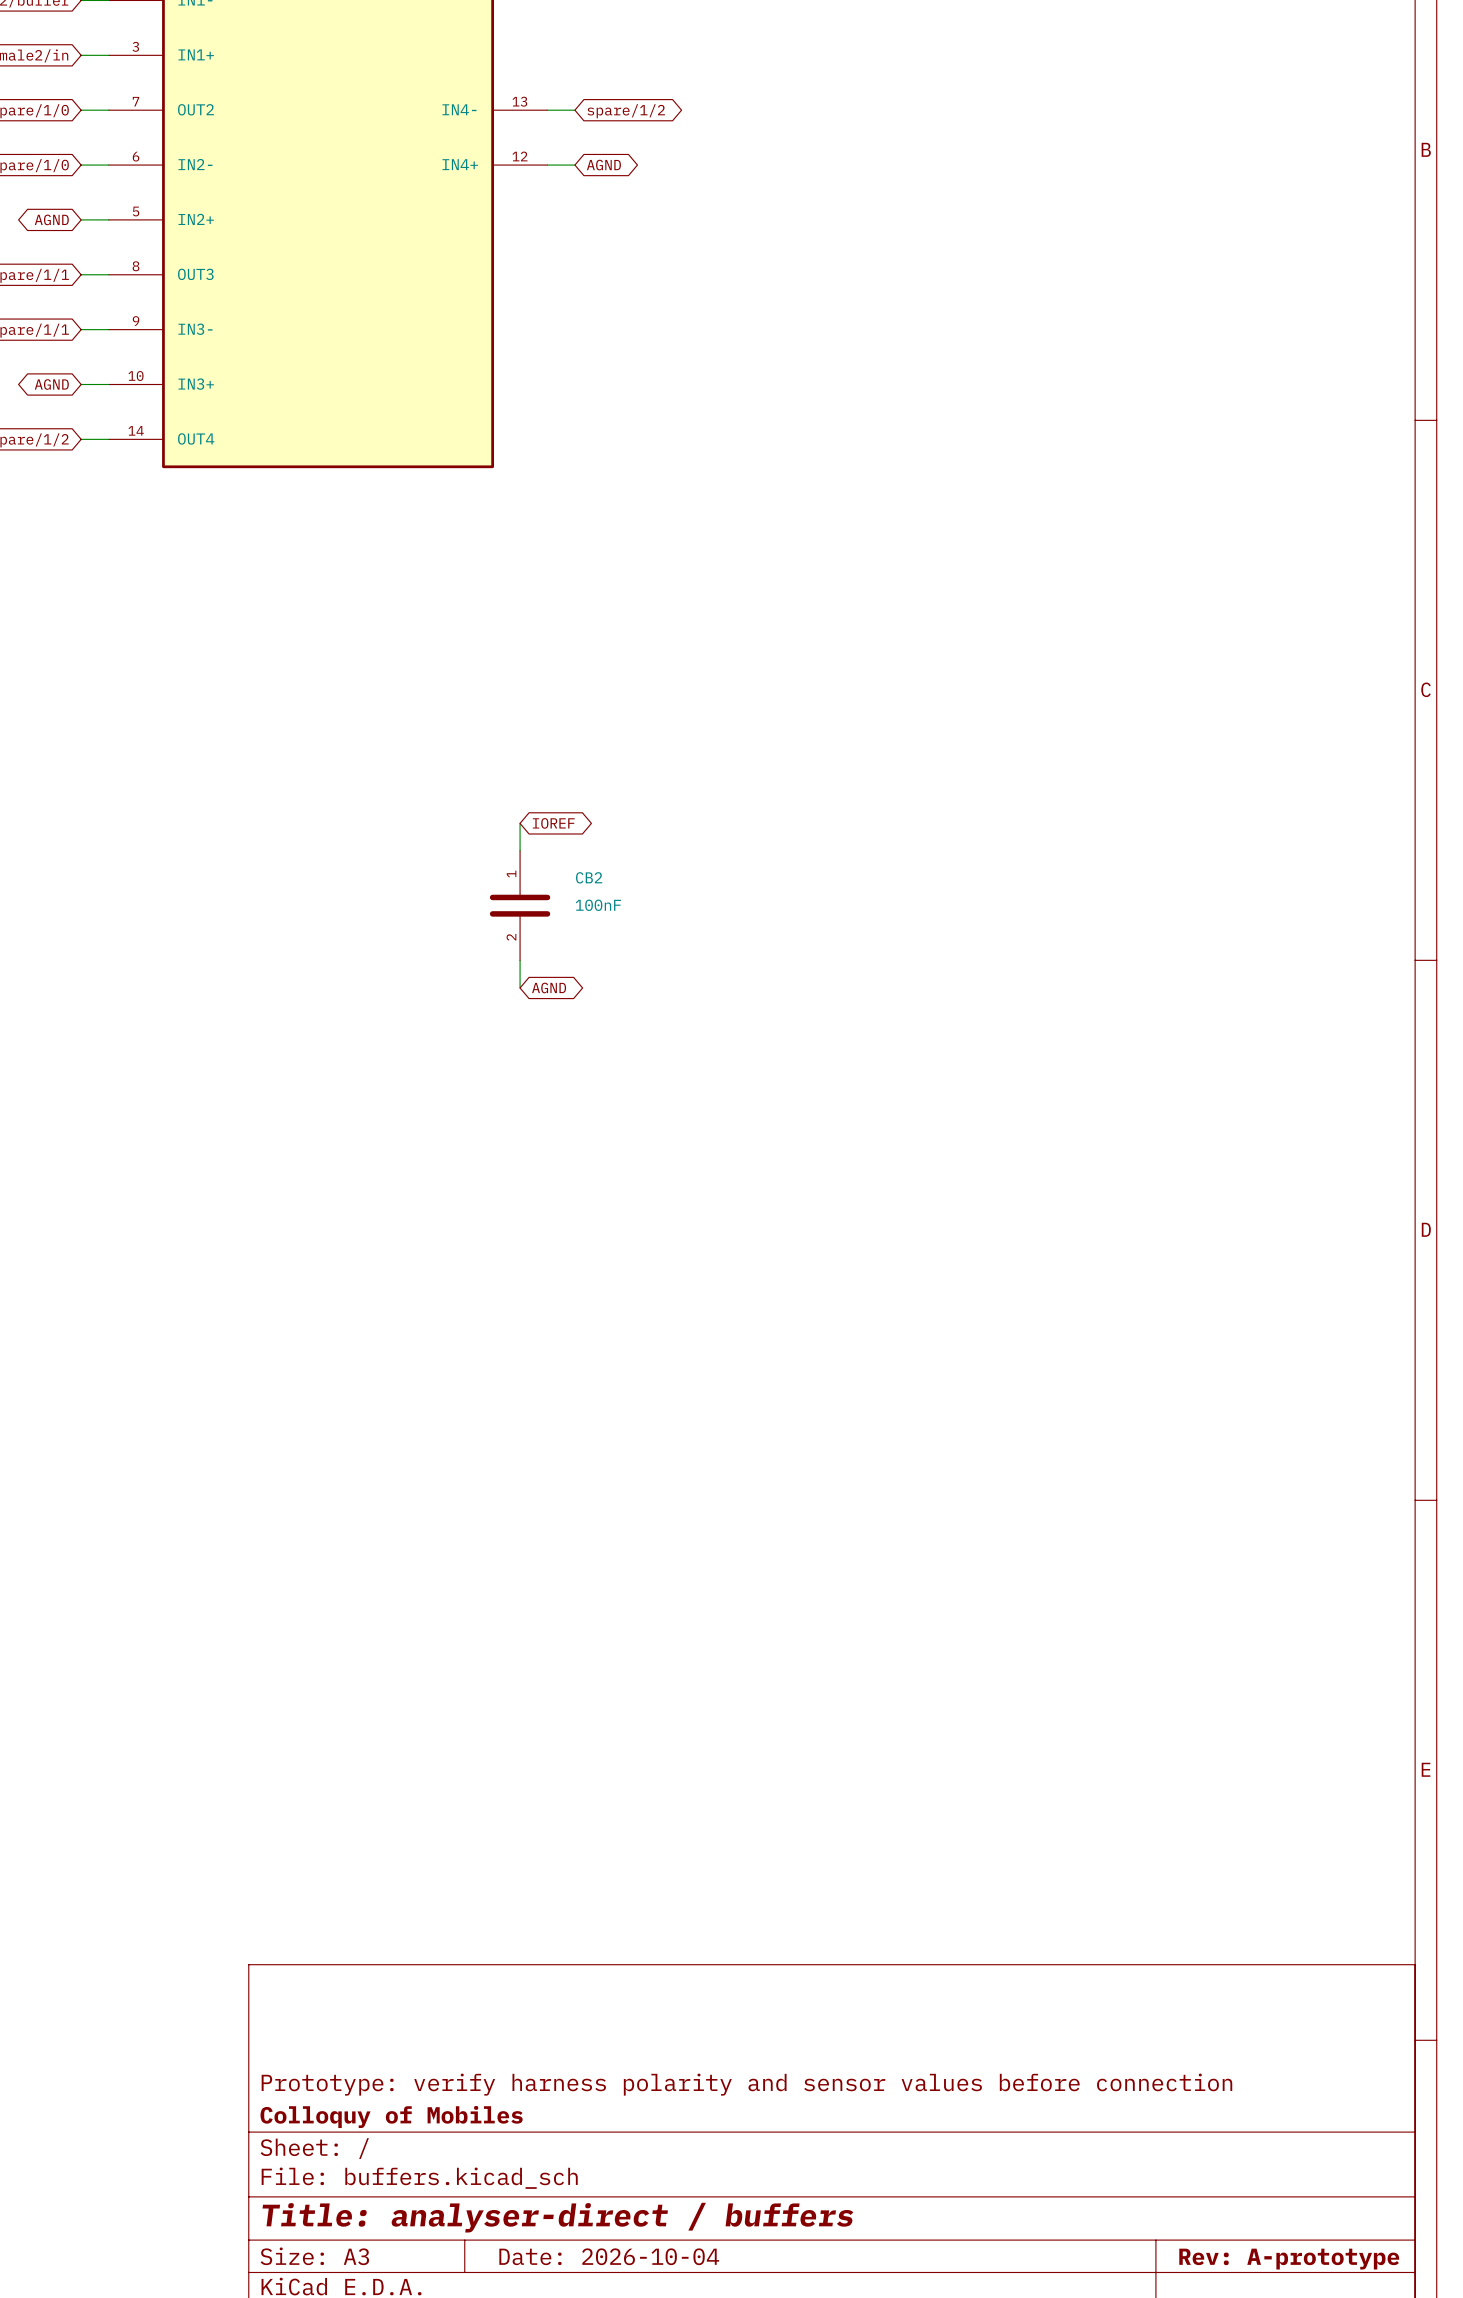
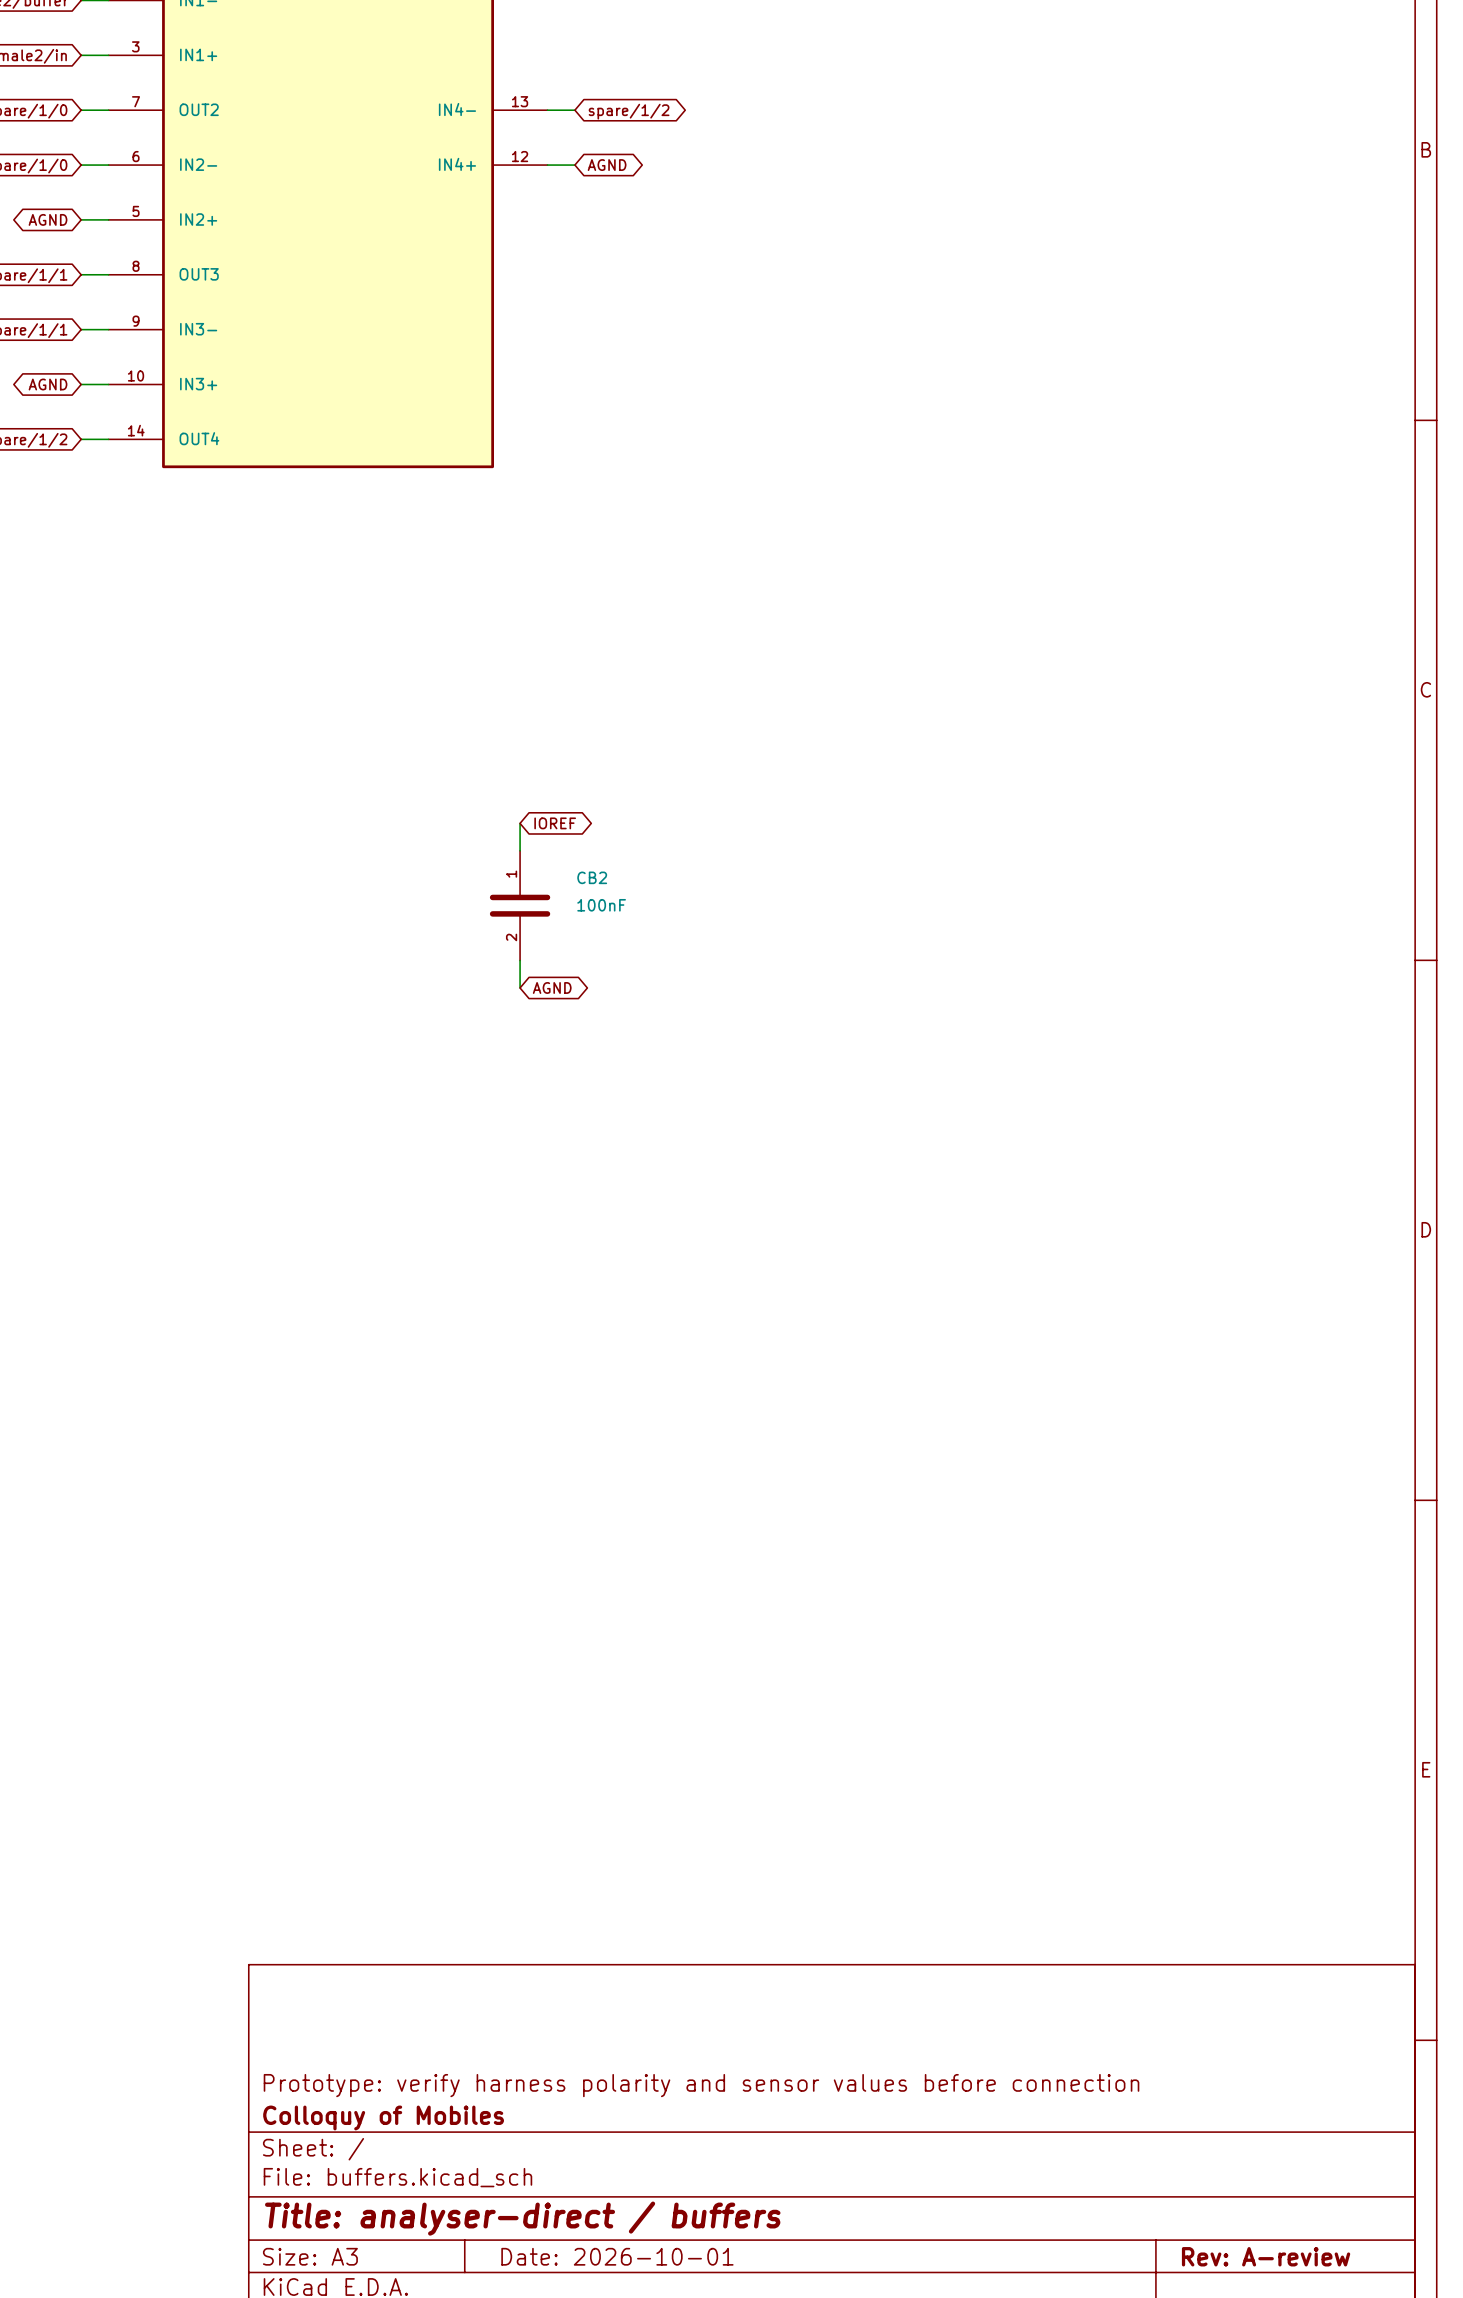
title block: Date: 2026-10-04 (609, 2256) -> Date: 2026-10-01 (617, 2256)
title block: Rev: A-prototype (1289, 2259) -> Rev: A-review (1266, 2256)

